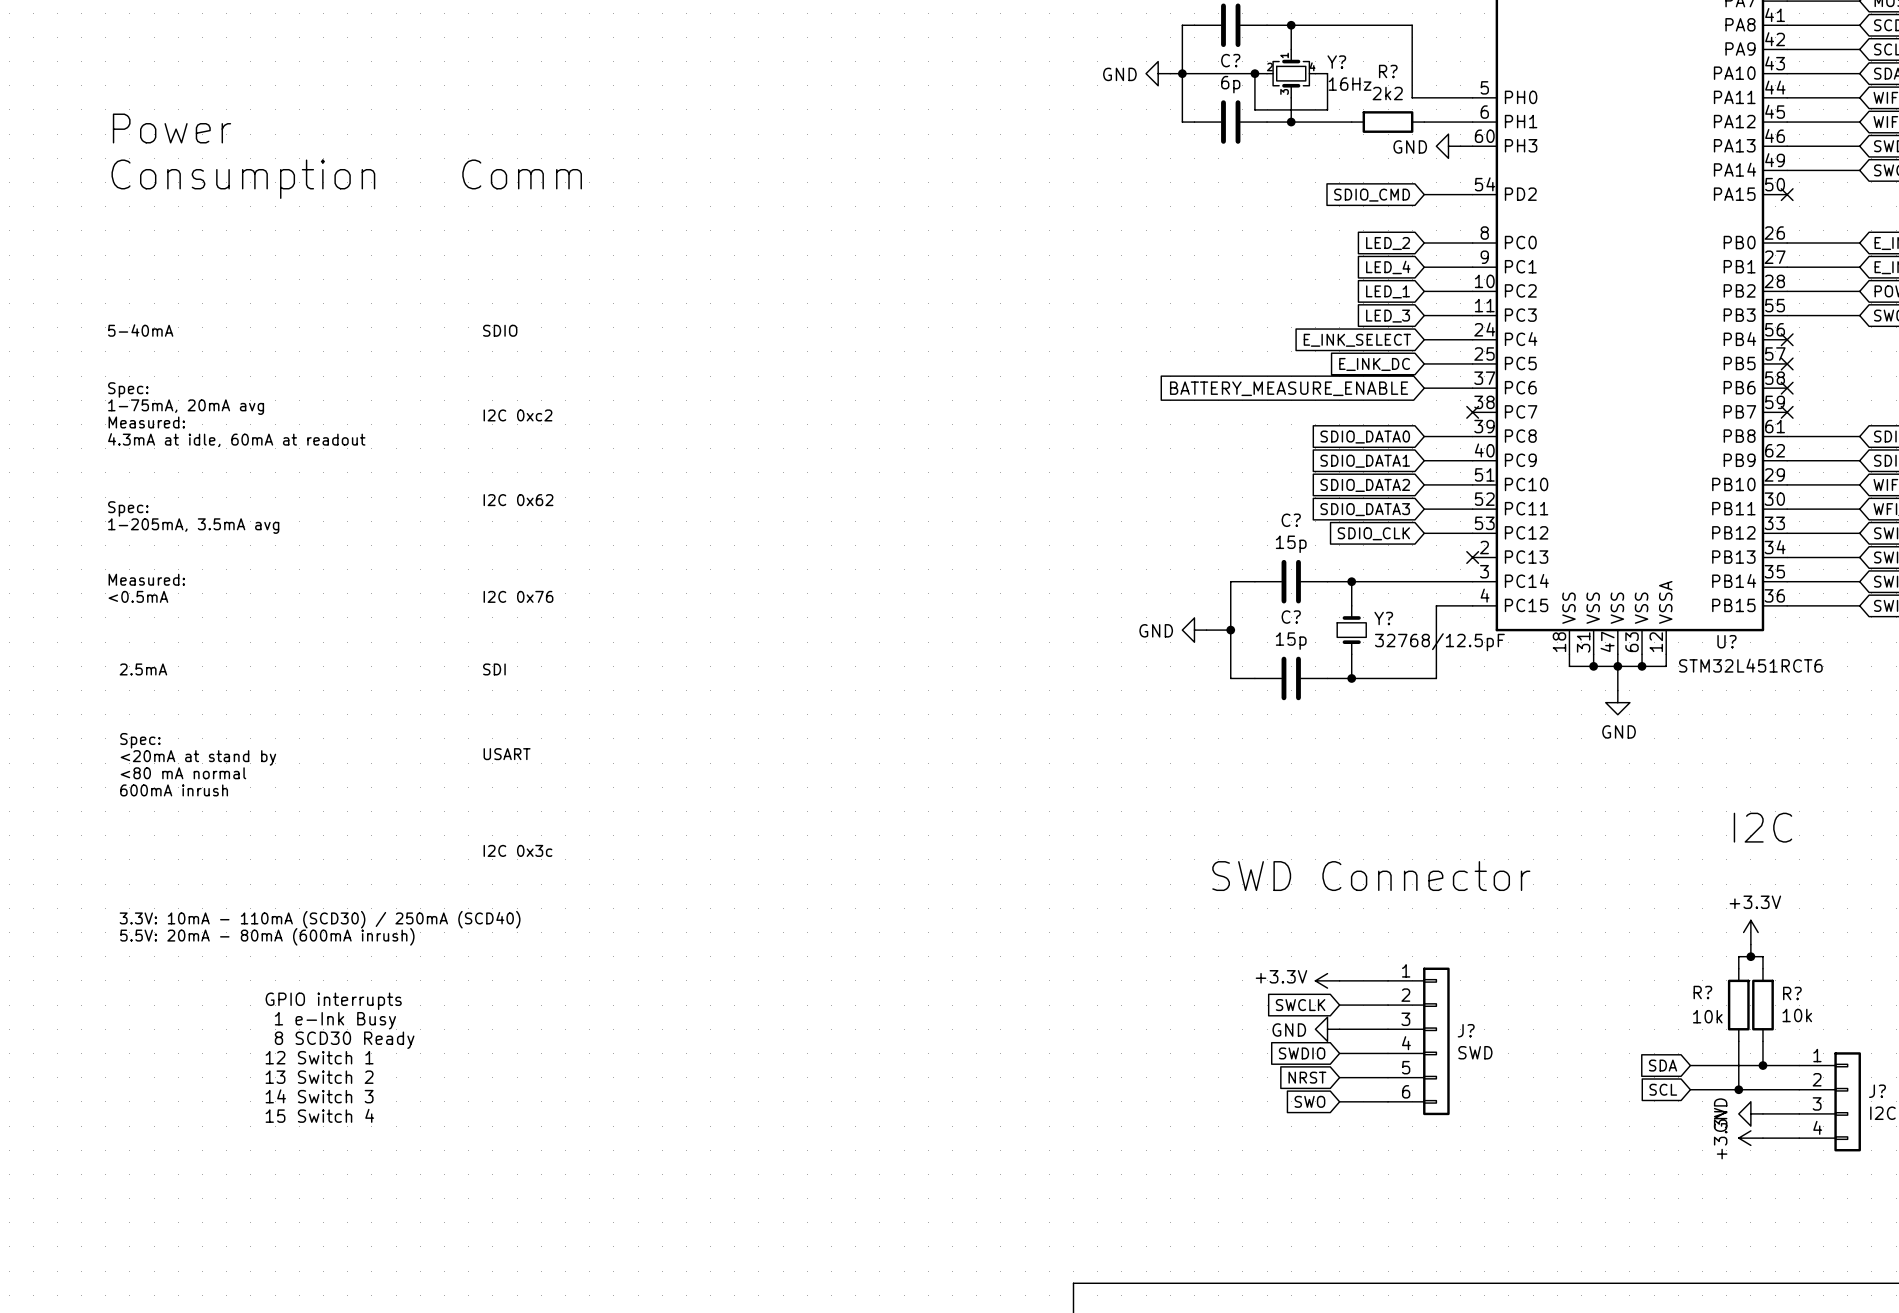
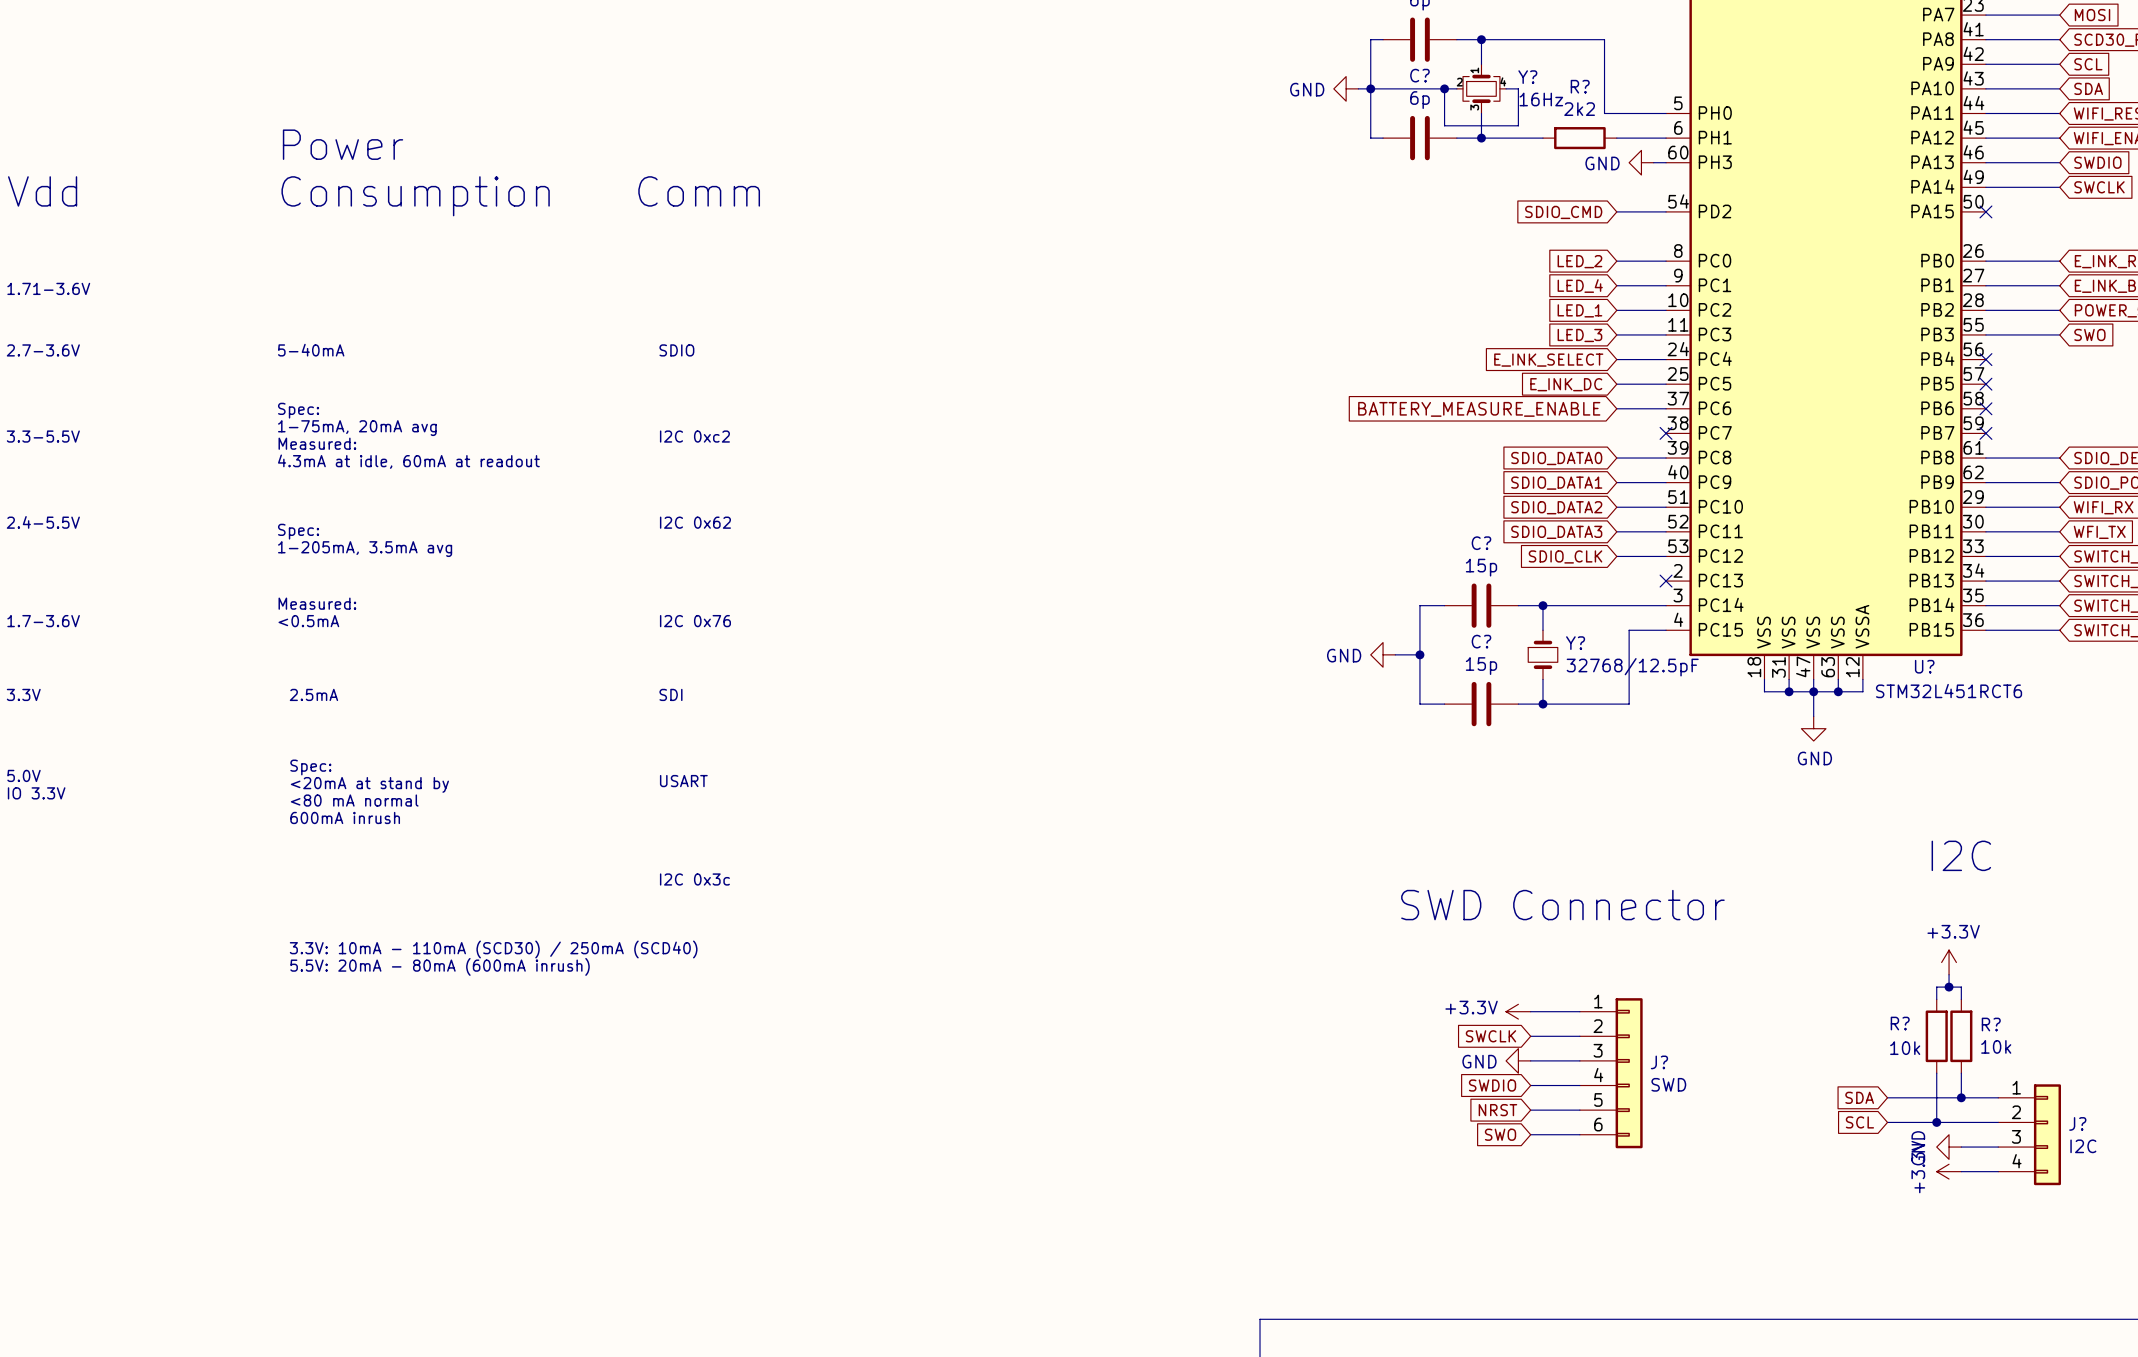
text: GPIO interrupts (333, 1001) -> none
text: 1 e-Ink Busy (335, 1020) -> none
text: 8 SCD30 Ready (344, 1040) -> none
text: 12 Switch 1 (319, 1057) -> none
text: 13 Switch 2 (319, 1077) -> none
text: 14 Switch 3 (319, 1096) -> none
text: 15 Switch 4 (319, 1115) -> none

